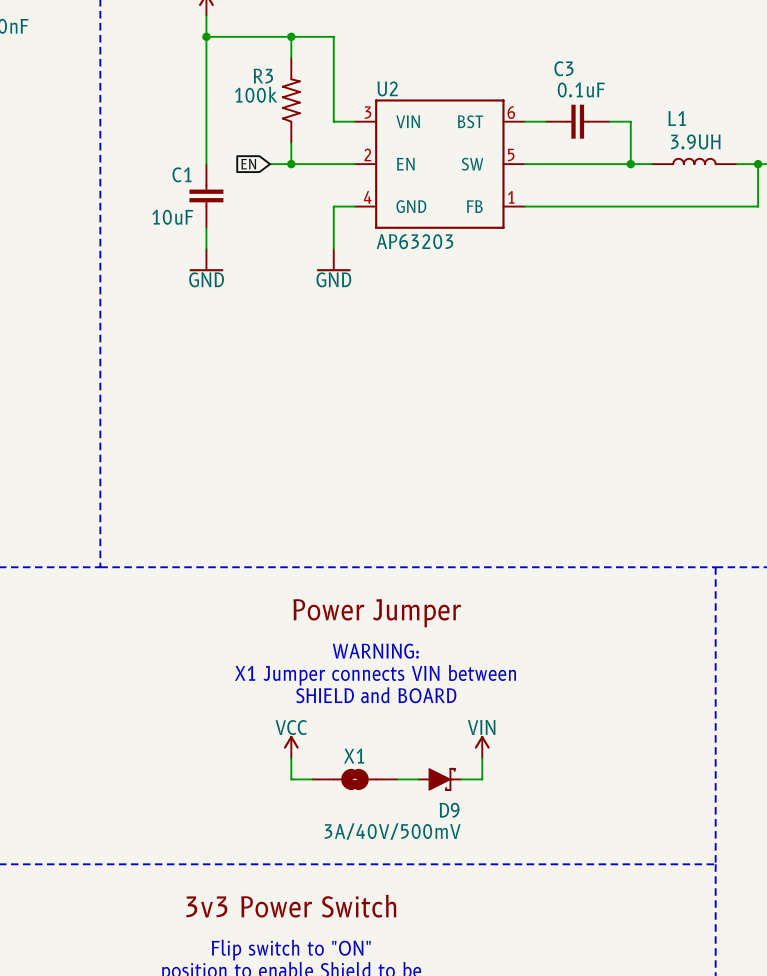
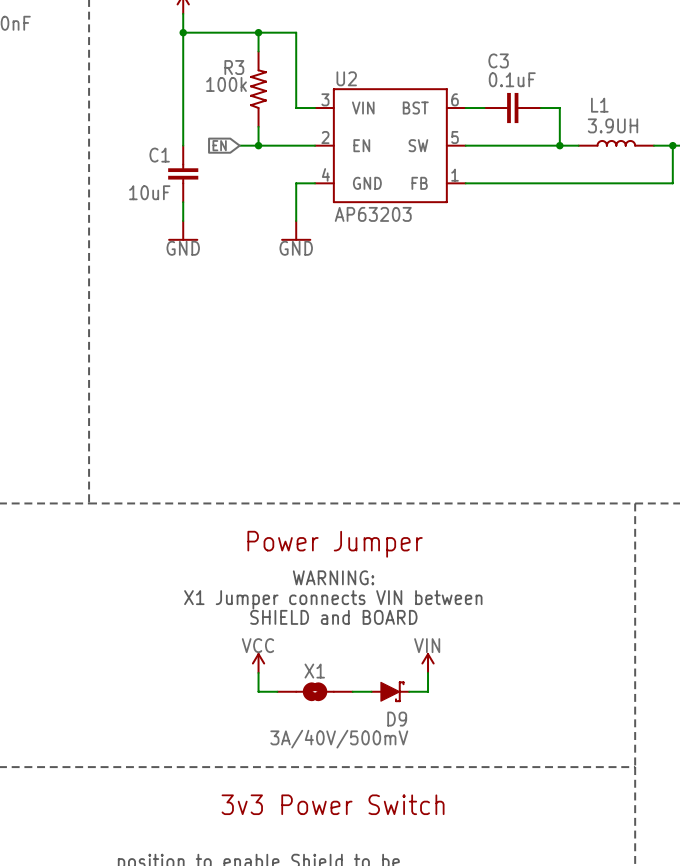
text position: 3v3 Power Switch (291, 906) -> 3v3 Power Switch (333, 804)
text: Flip switch to "ON" (291, 950) -> none

